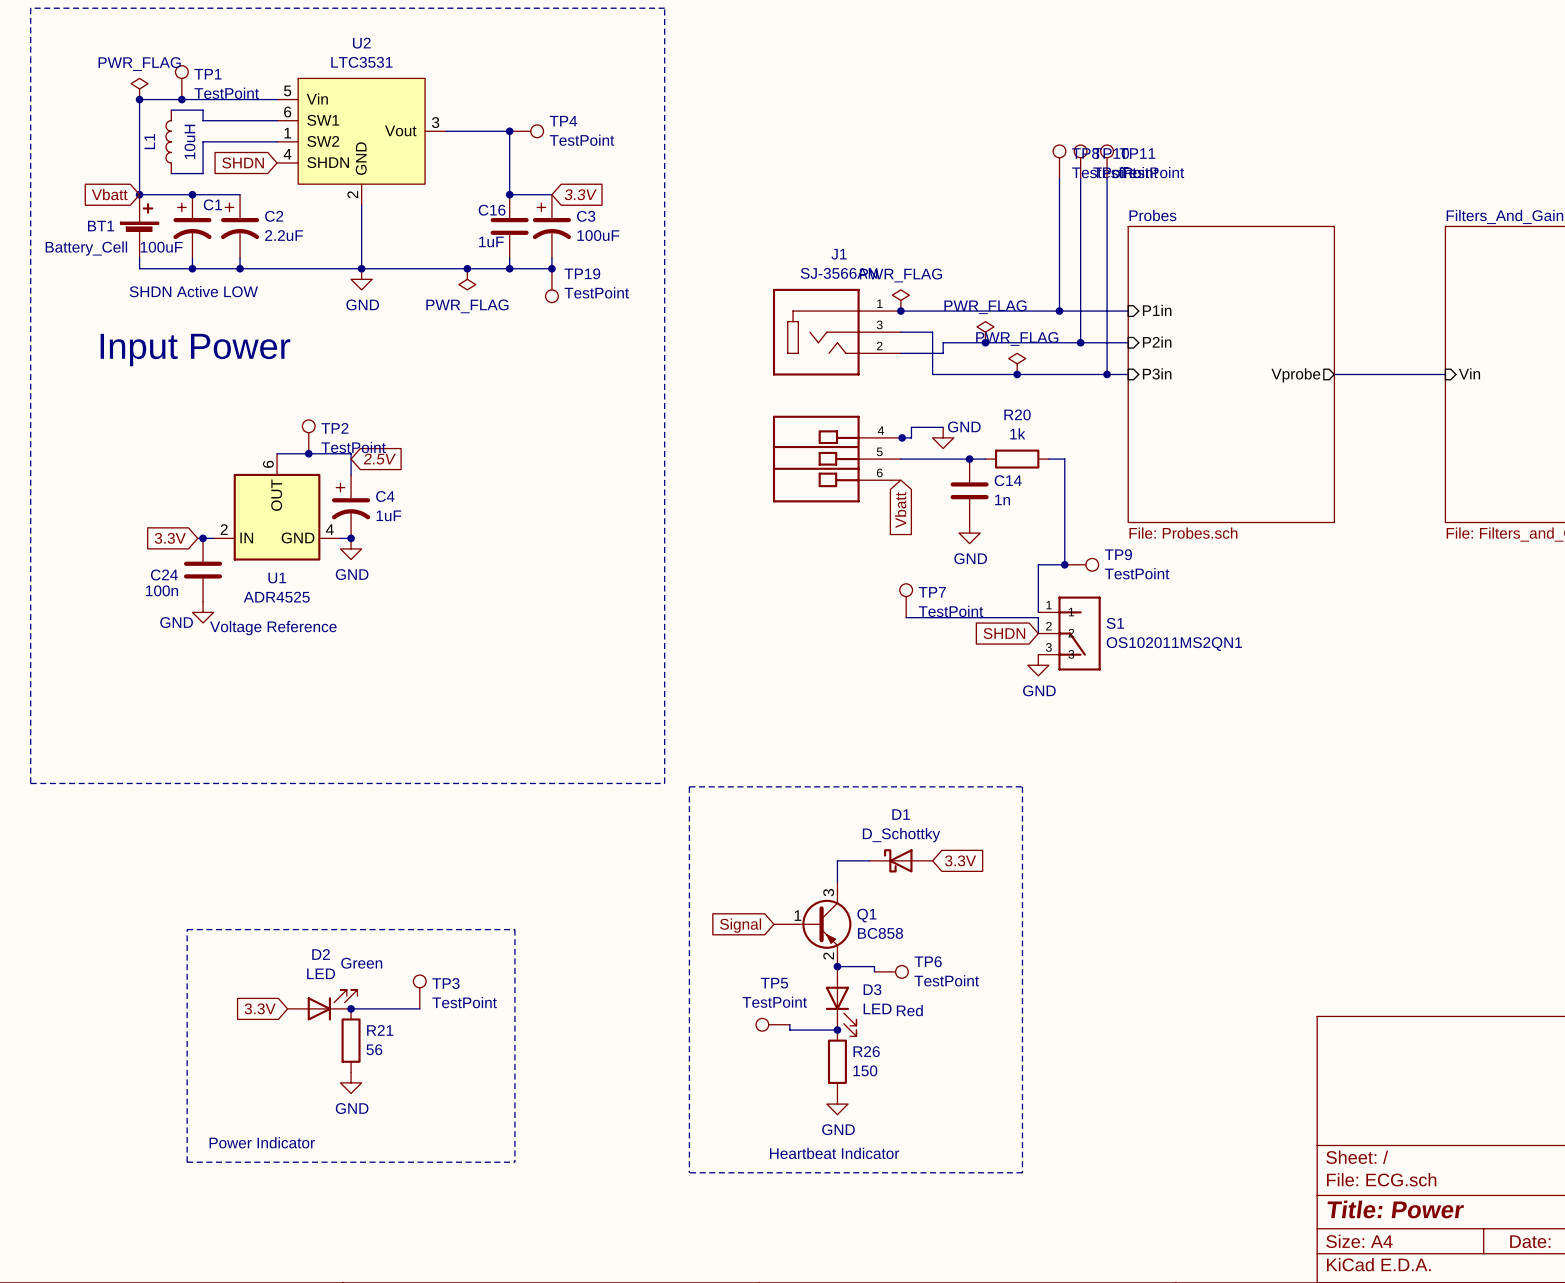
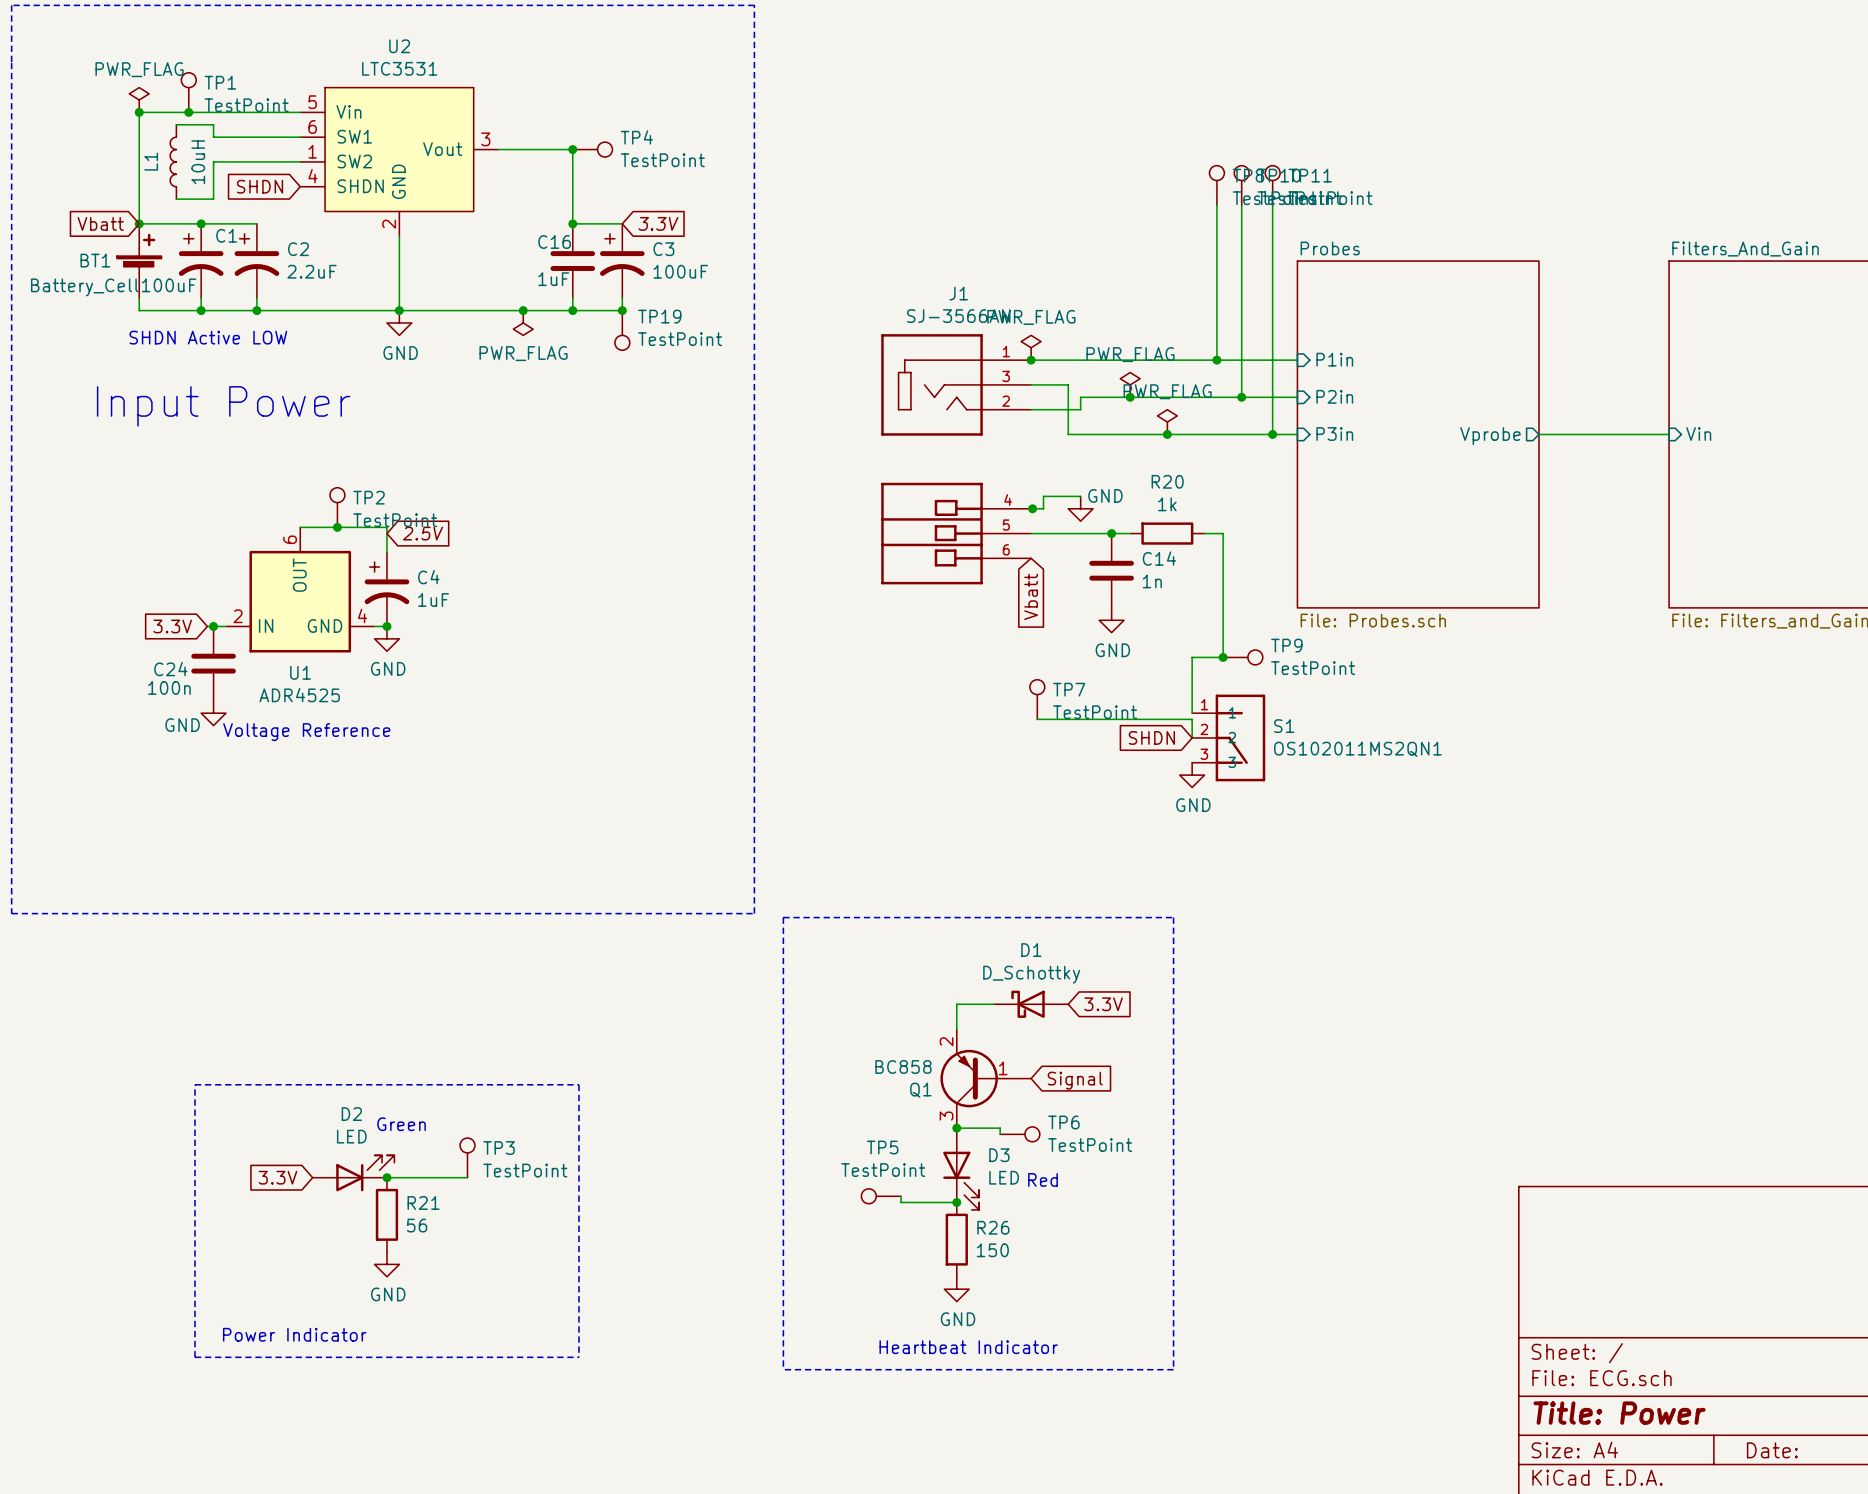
Q1 rotation: 0° (826, 924) -> 180° (969, 1078)
global label rotation: 0° (740, 925) -> 180° (1075, 1080)
global label position: Signal (740, 925) -> Signal (1075, 1080)

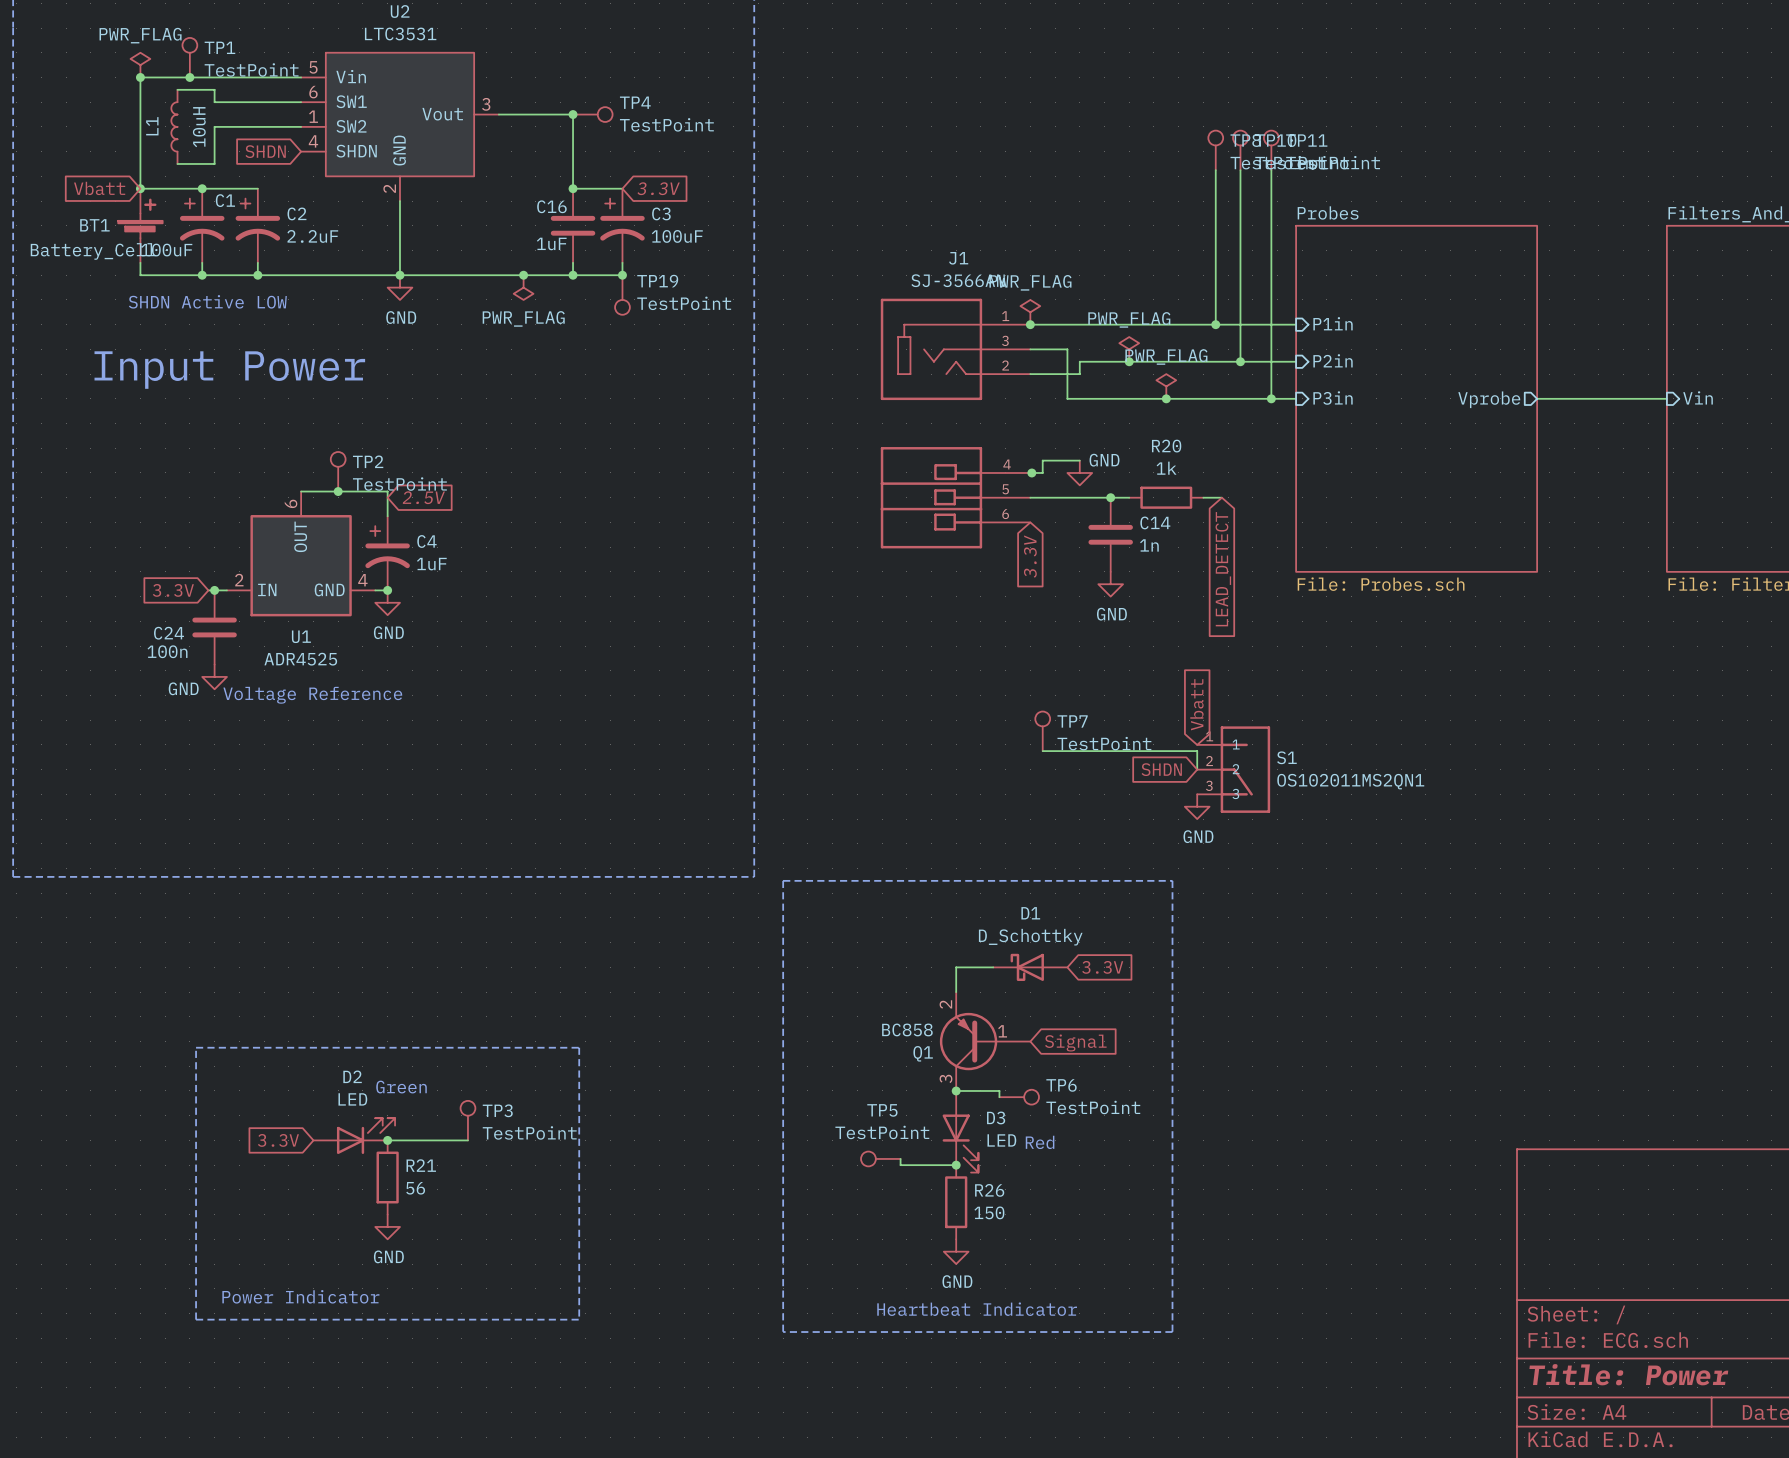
wire: (1223, 533) (1223, 657) (1192, 657) (1192, 713) -> none
global label: Vbatt (1031, 596) -> 3.3V (1030, 556)
global label: none -> LEAD_DETECT (1223, 569)
junction: (1223, 657) -> none
TP9: TestPoint (1242, 657) -> none
TP7 position: (1037, 699) -> (1042, 731)
wire: (1037, 719) (1192, 719) (1192, 737) -> (1042, 751) (1197, 751) (1197, 769)
global label position: SHDN (1151, 737) -> SHDN (1161, 769)
S1 position: (1228, 737) -> (1233, 769)
global label: none -> Vbatt (1196, 704)
power symbol position: GND (1192, 775) -> GND (1197, 806)

